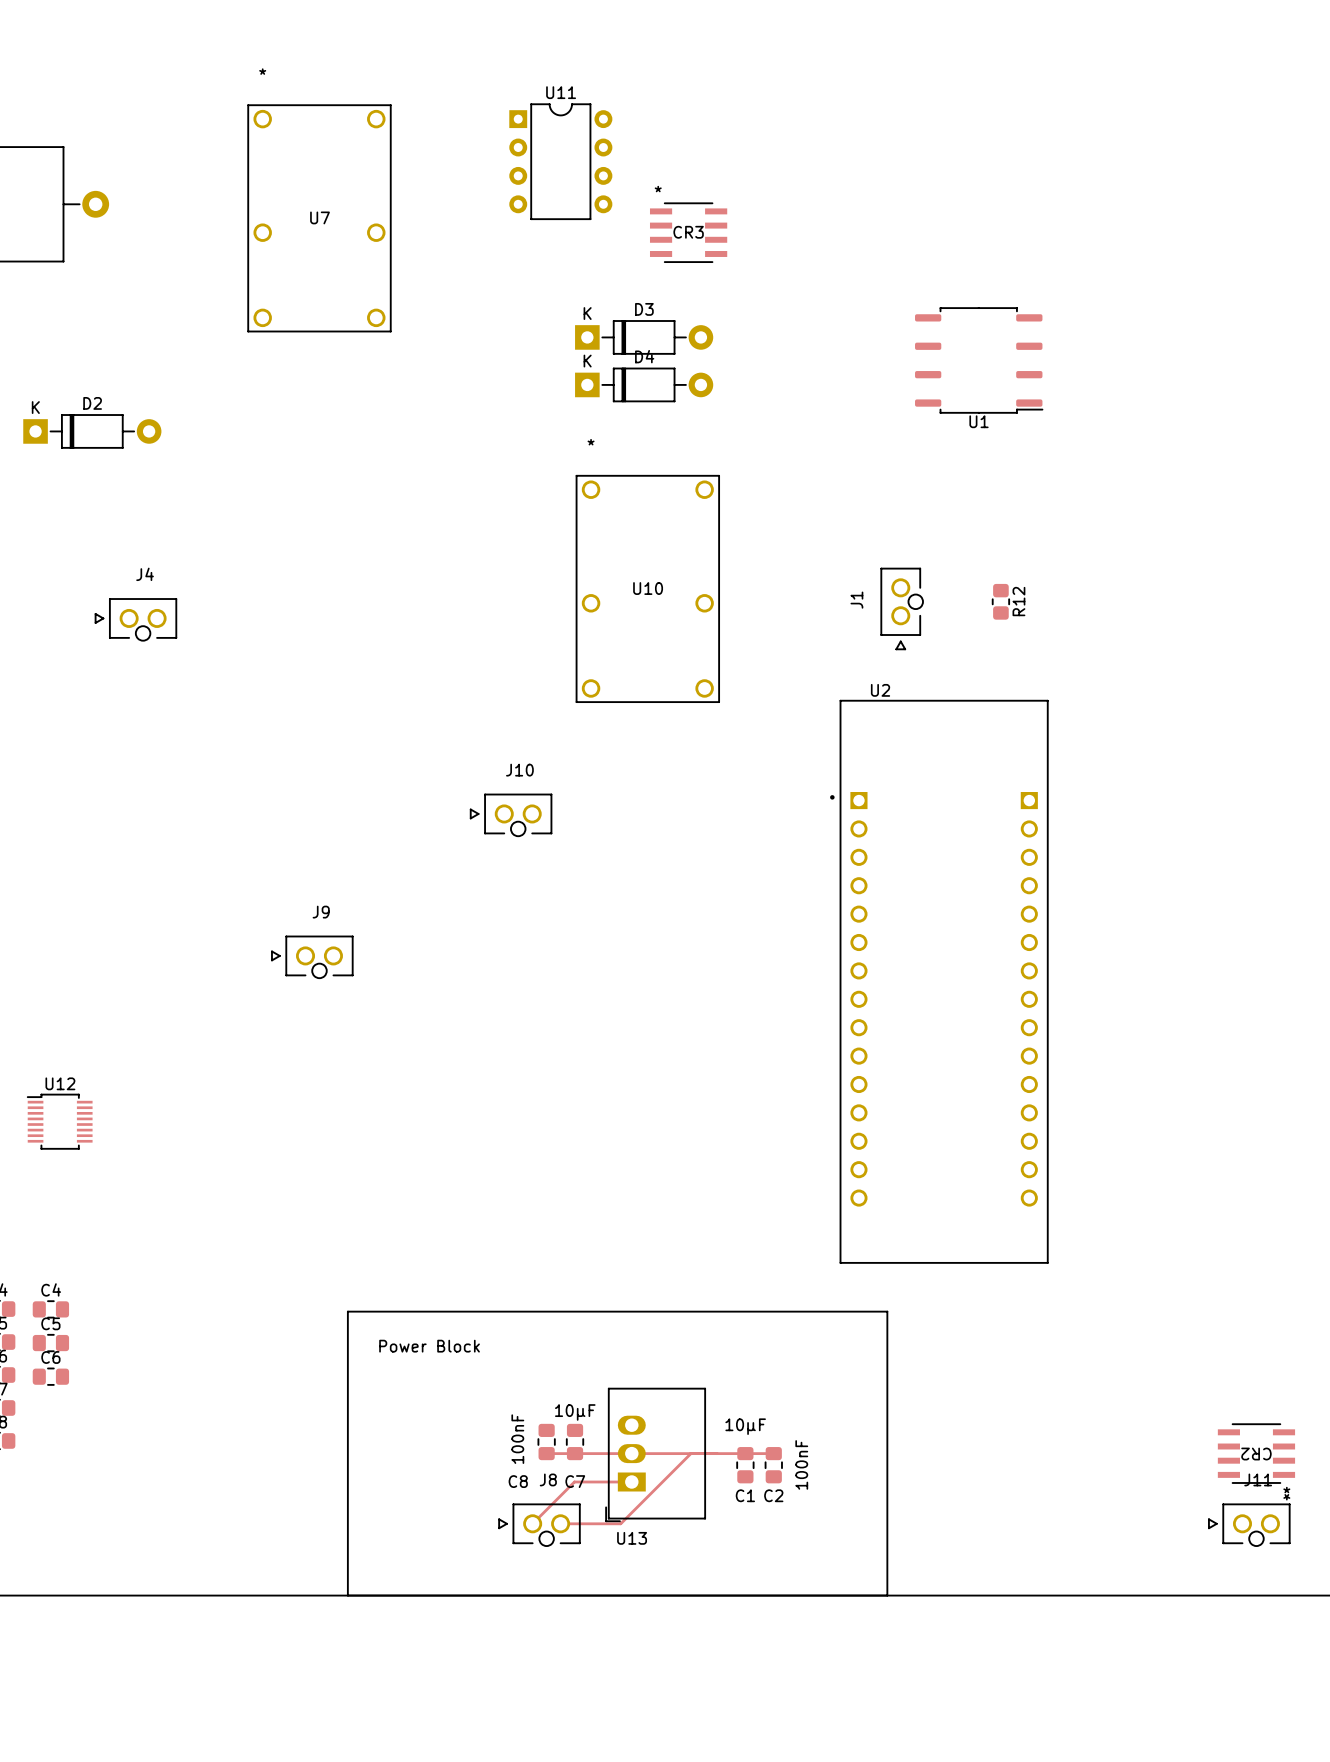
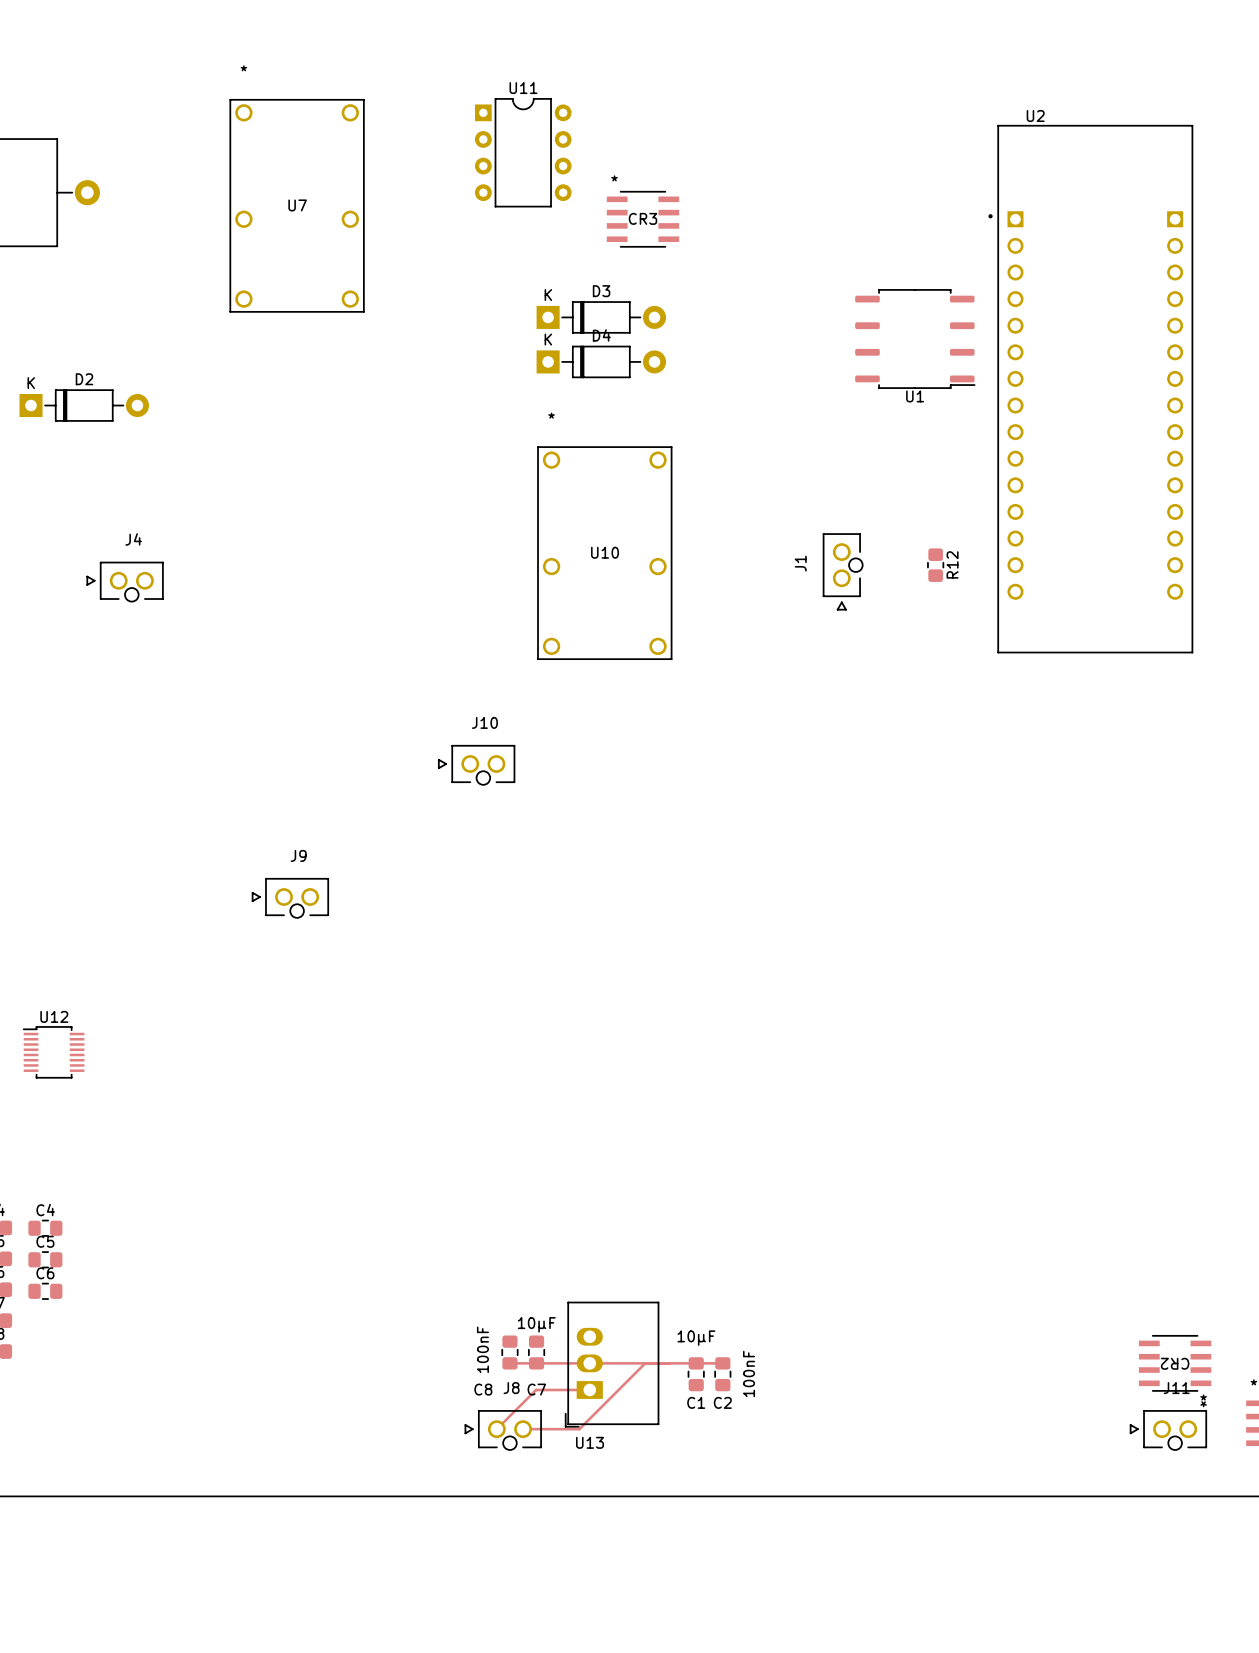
U2 position: (939, 981) -> (1090, 389)
line: (347, 1311) (887, 1311) (887, 1595) (347, 1595) (347, 1311) -> none
text: Power Block (429, 1346) -> none

